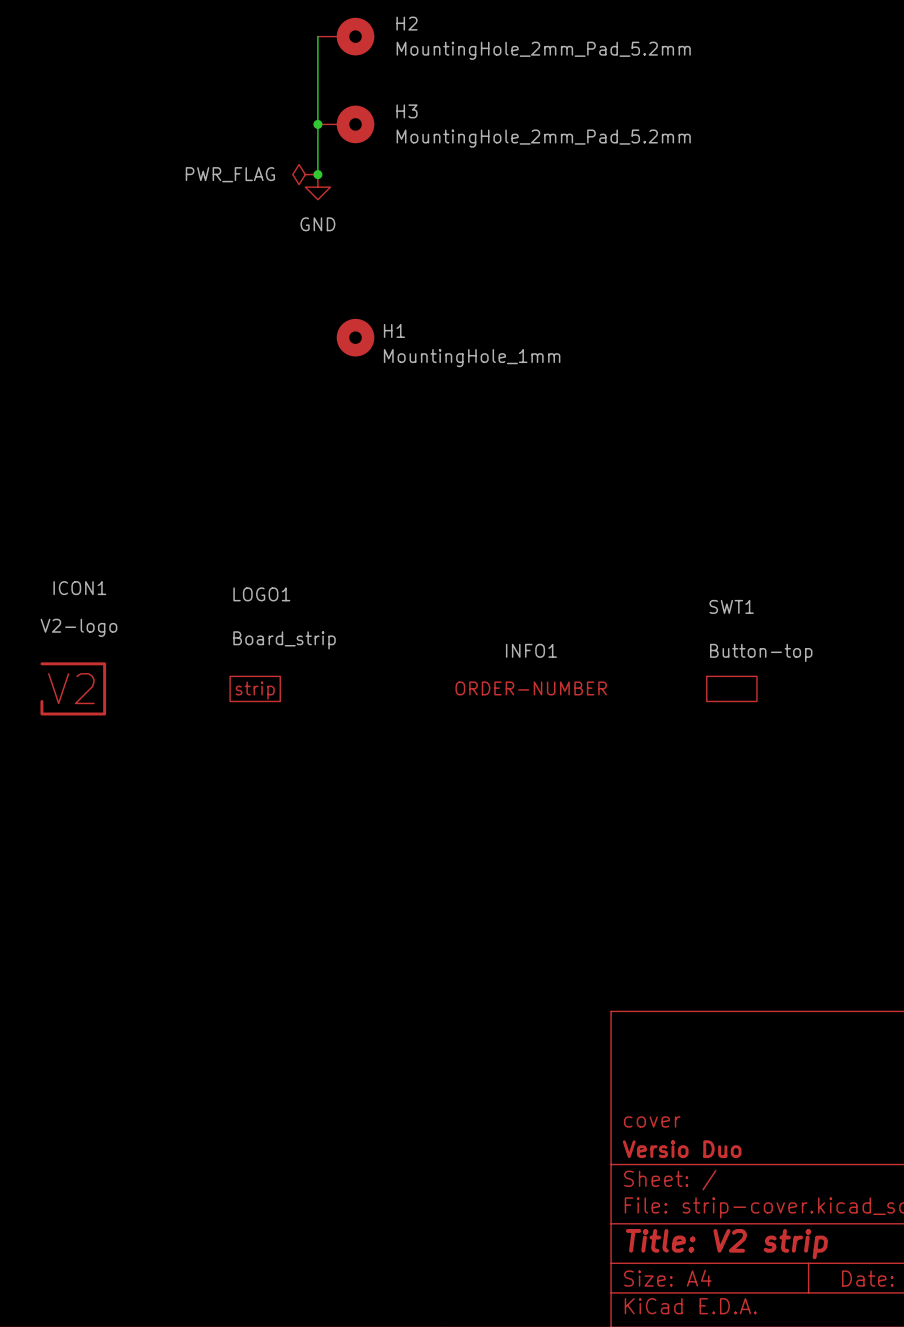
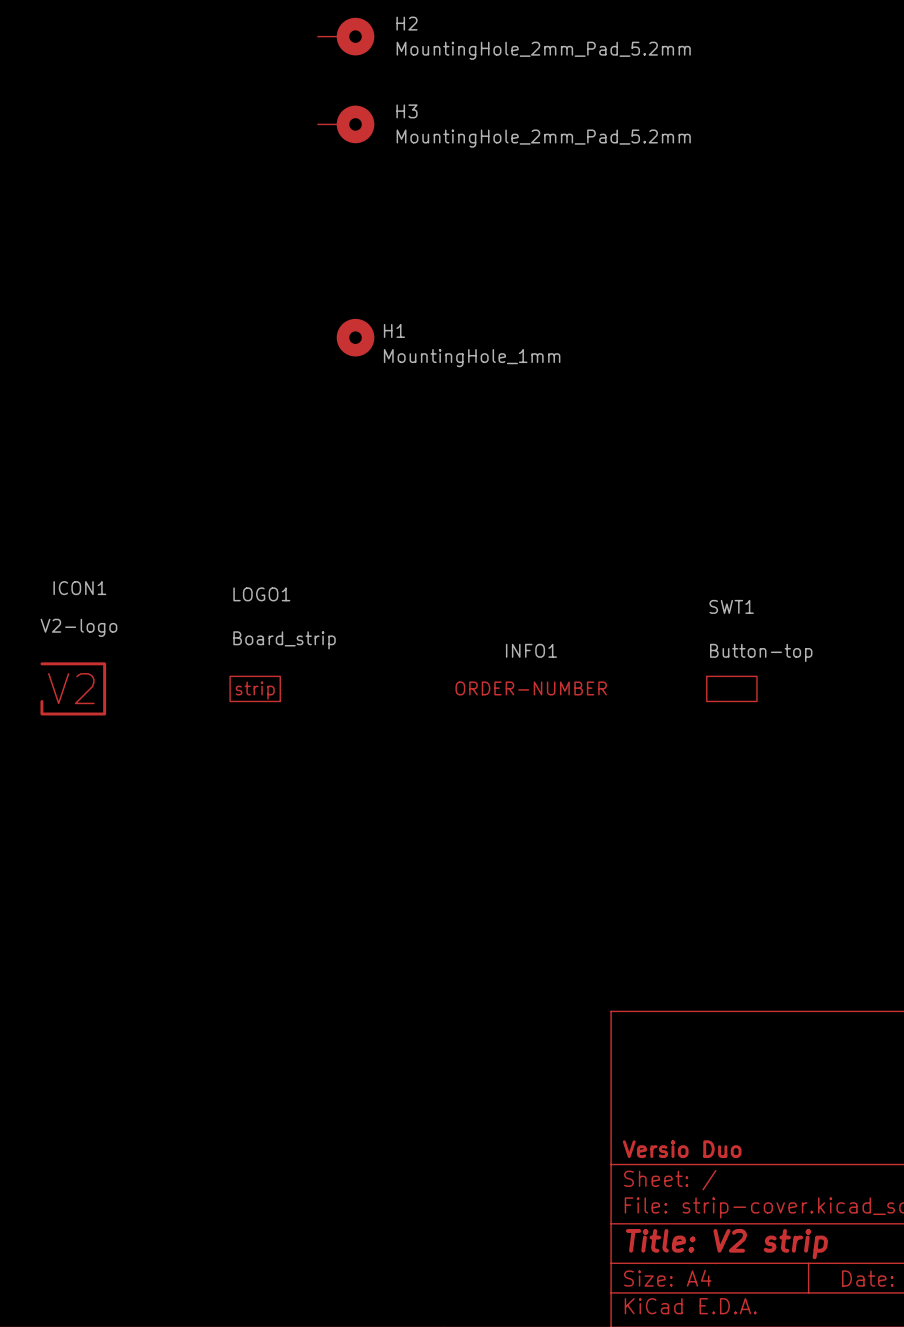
wire: (317, 36) (317, 174) -> none
junction: (317, 124) -> none
power symbol: PWR_FLAG (305, 174) -> none
junction: (317, 174) -> none
power symbol: GND (317, 187) -> none
title block: cover (652, 1121) -> none

